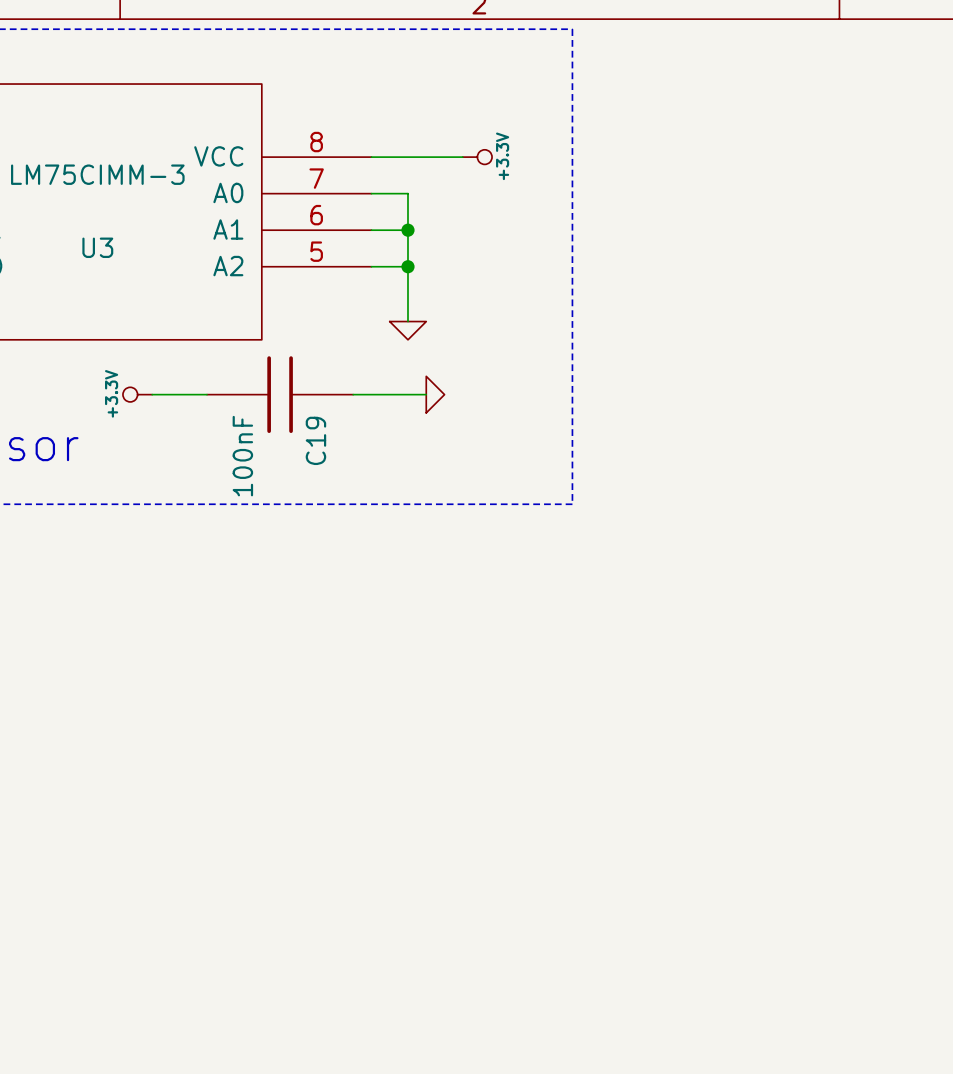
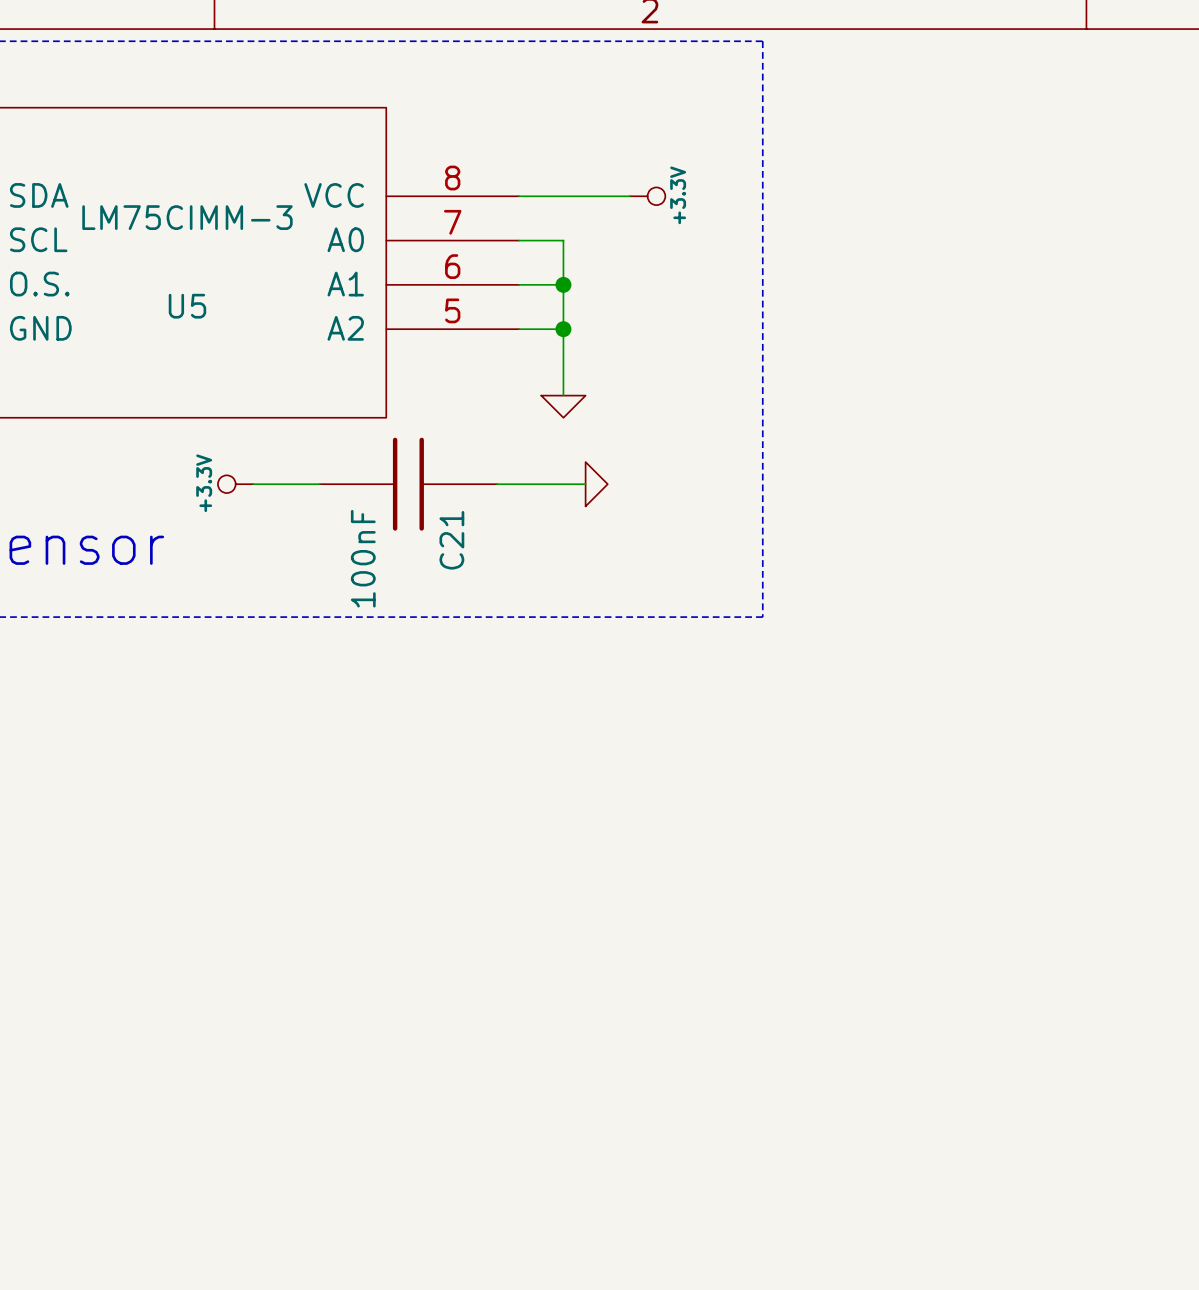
U3 name: U3 (97, 247) -> U5 (187, 306)
C19 name: C19 (315, 440) -> C21 (451, 540)

